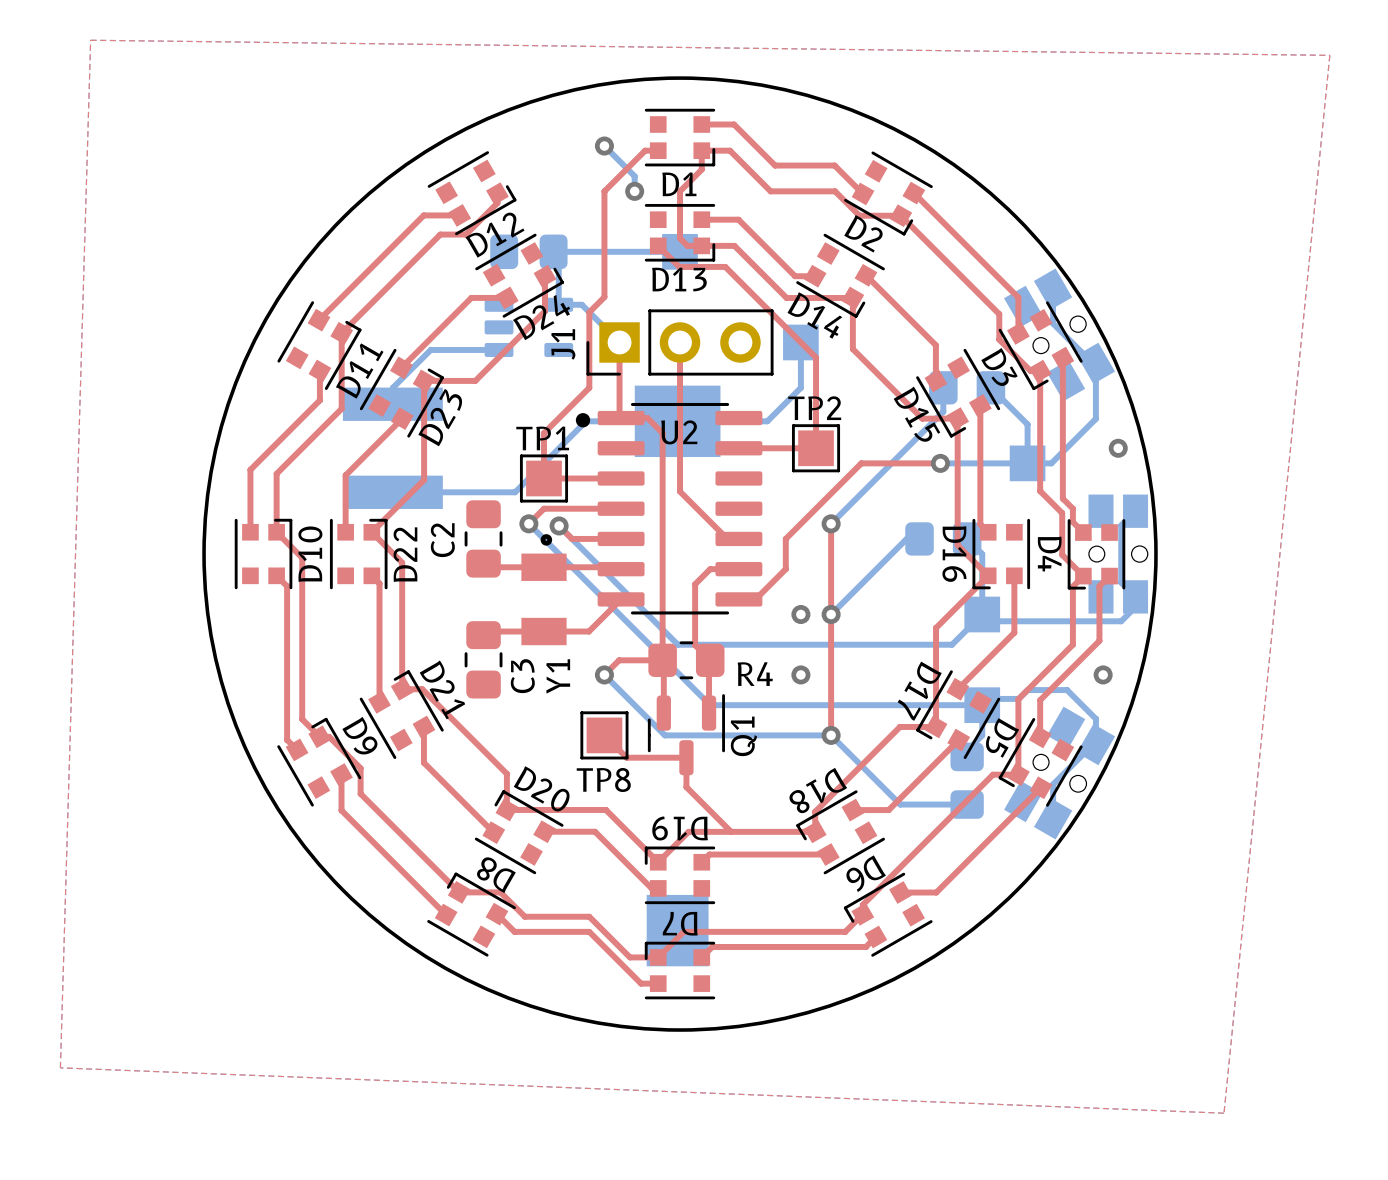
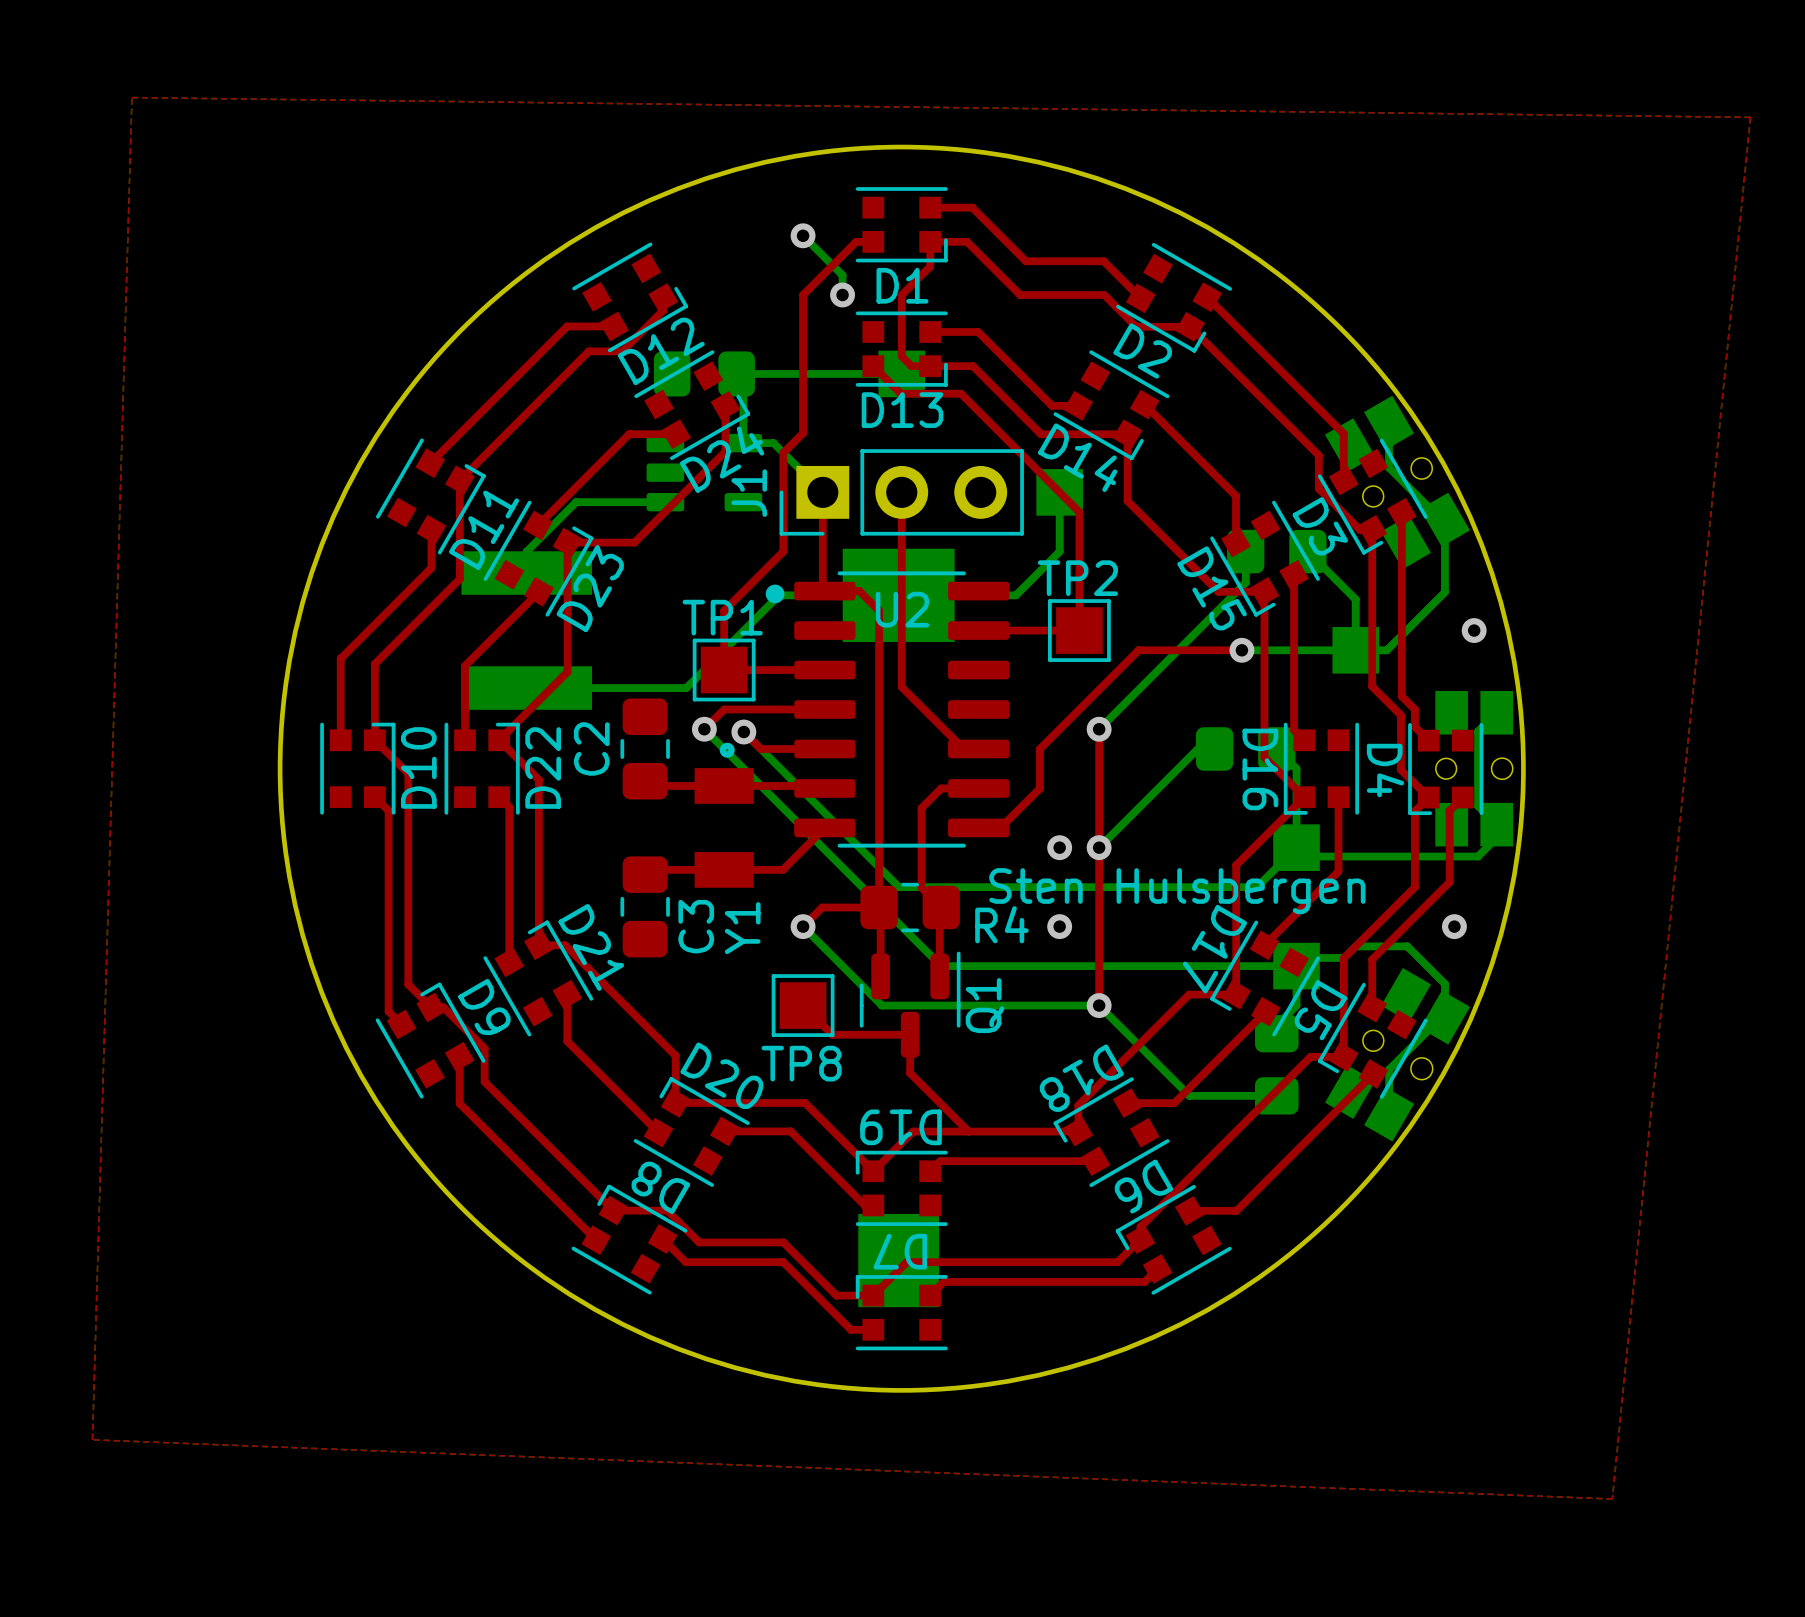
text: none -> Sten Hulsbergen (1177, 891)

